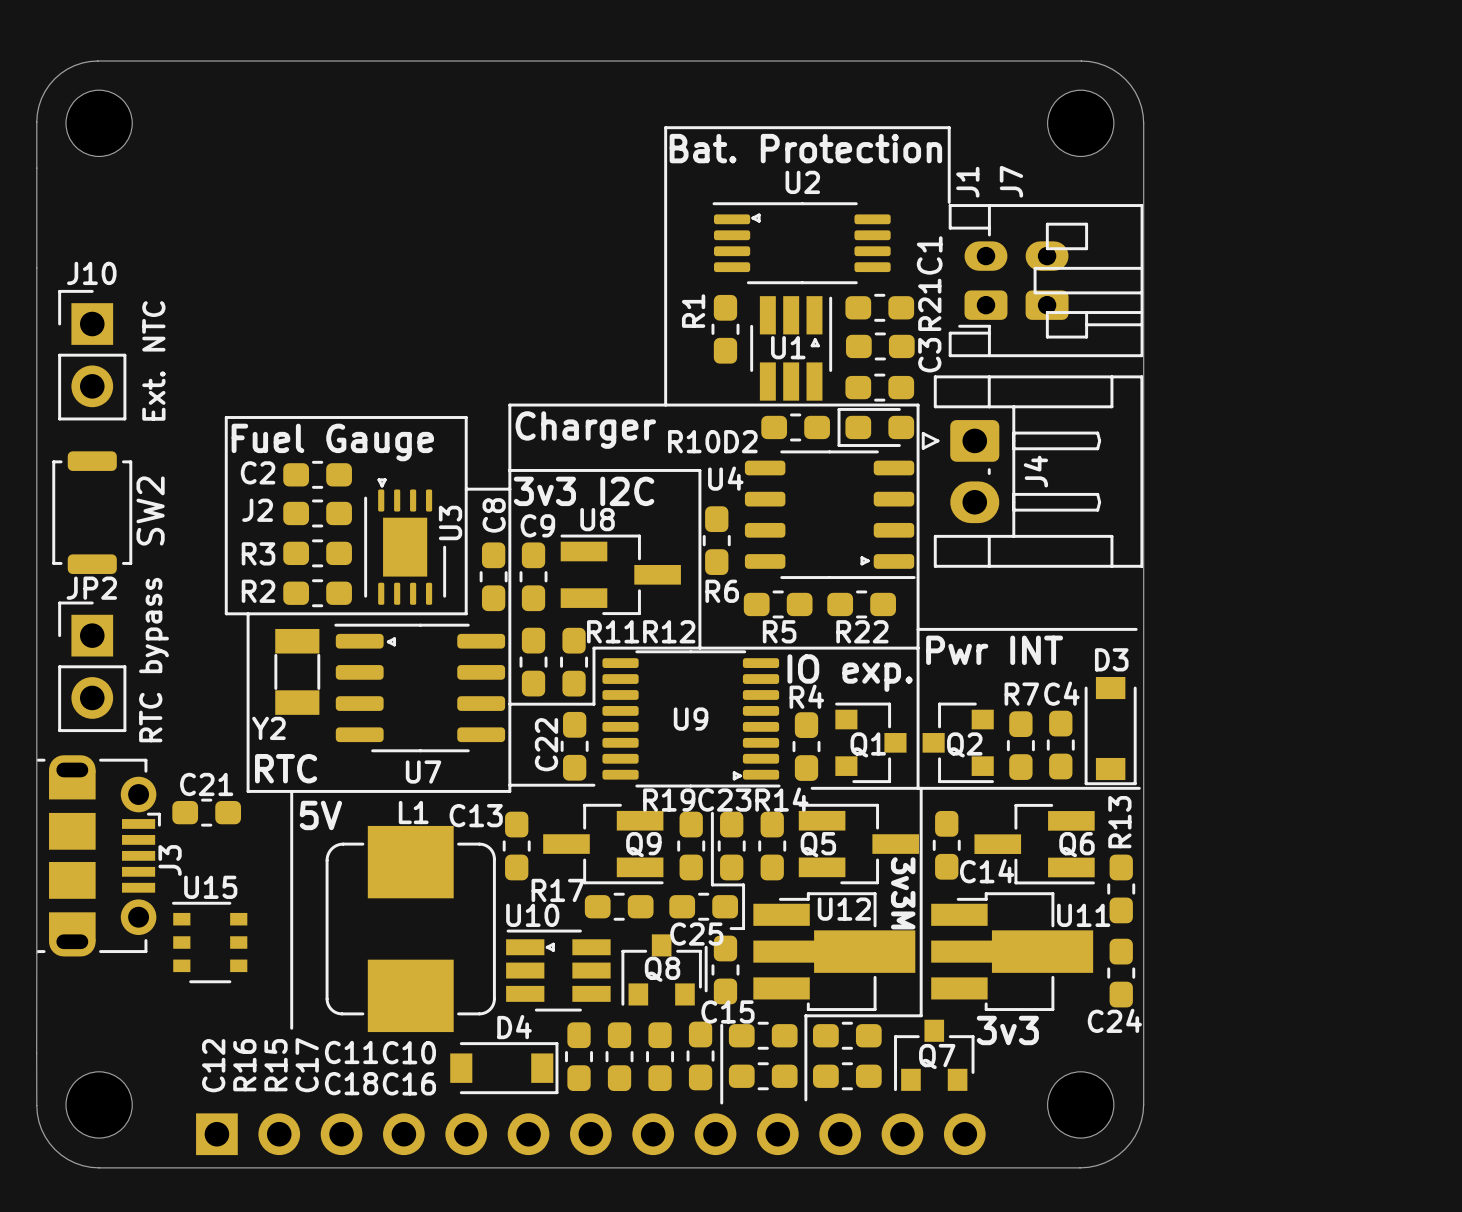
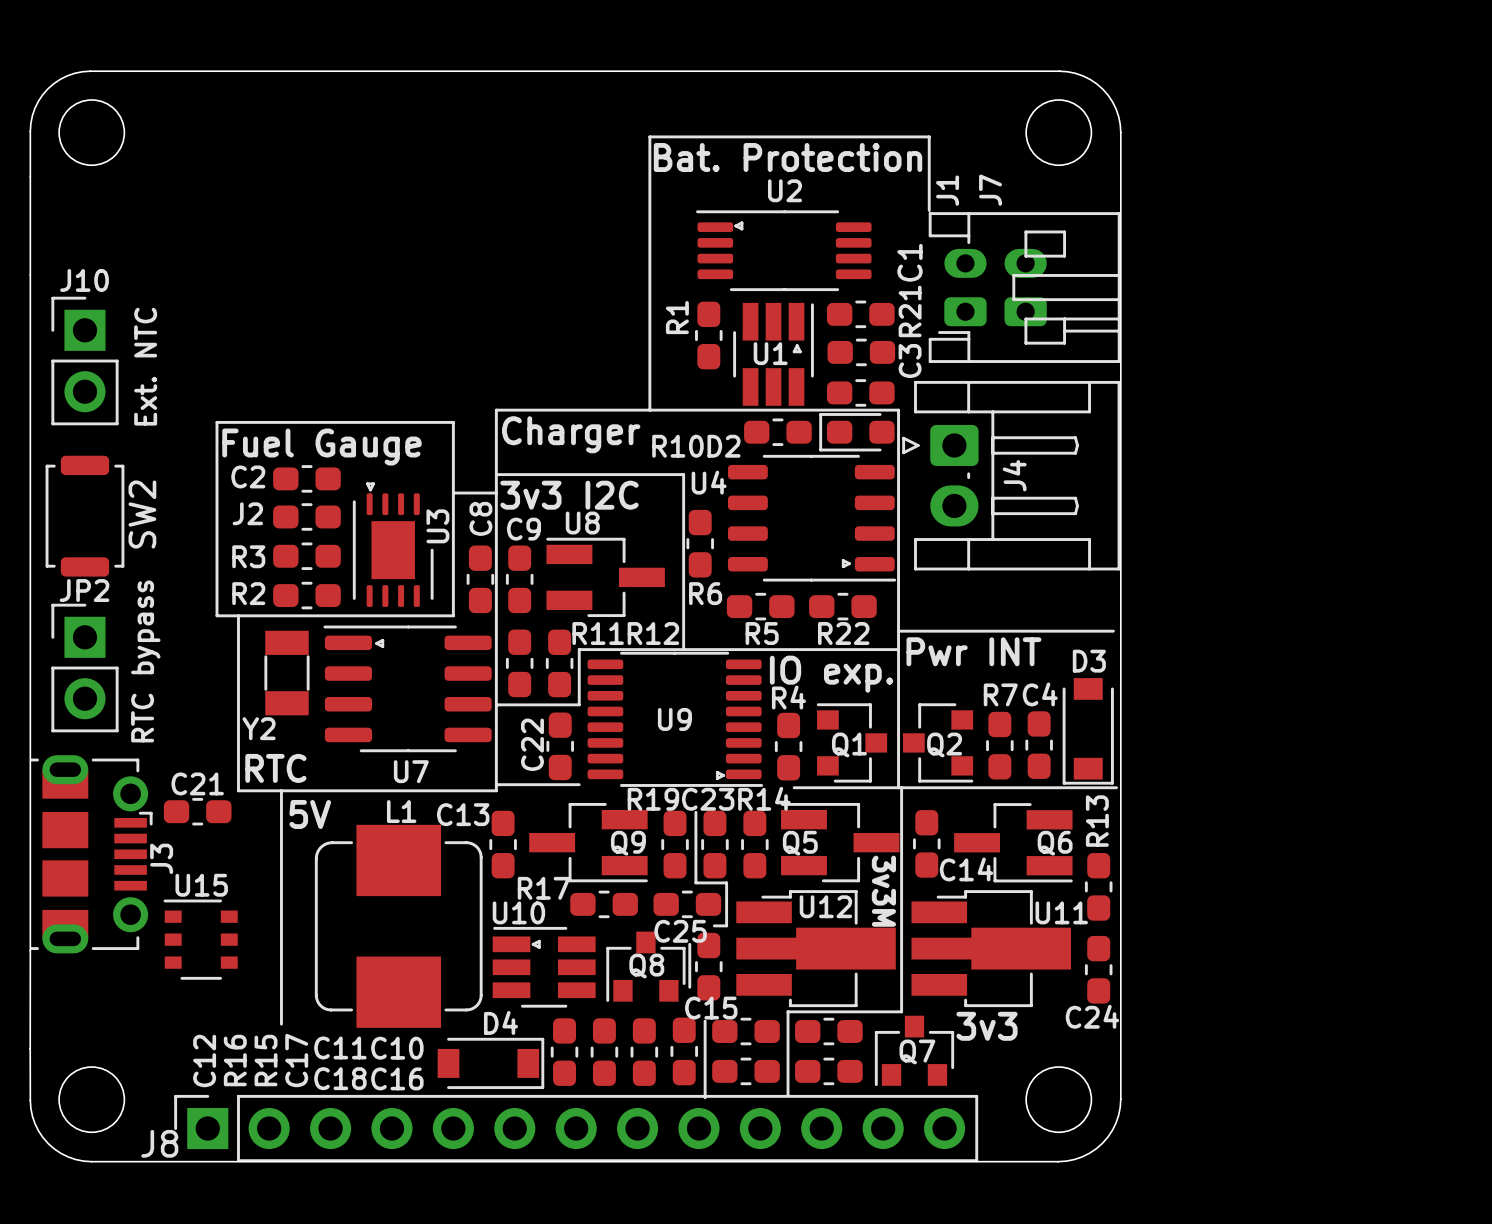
J8 side: bottom (590, 1134) -> top (576, 1128)

